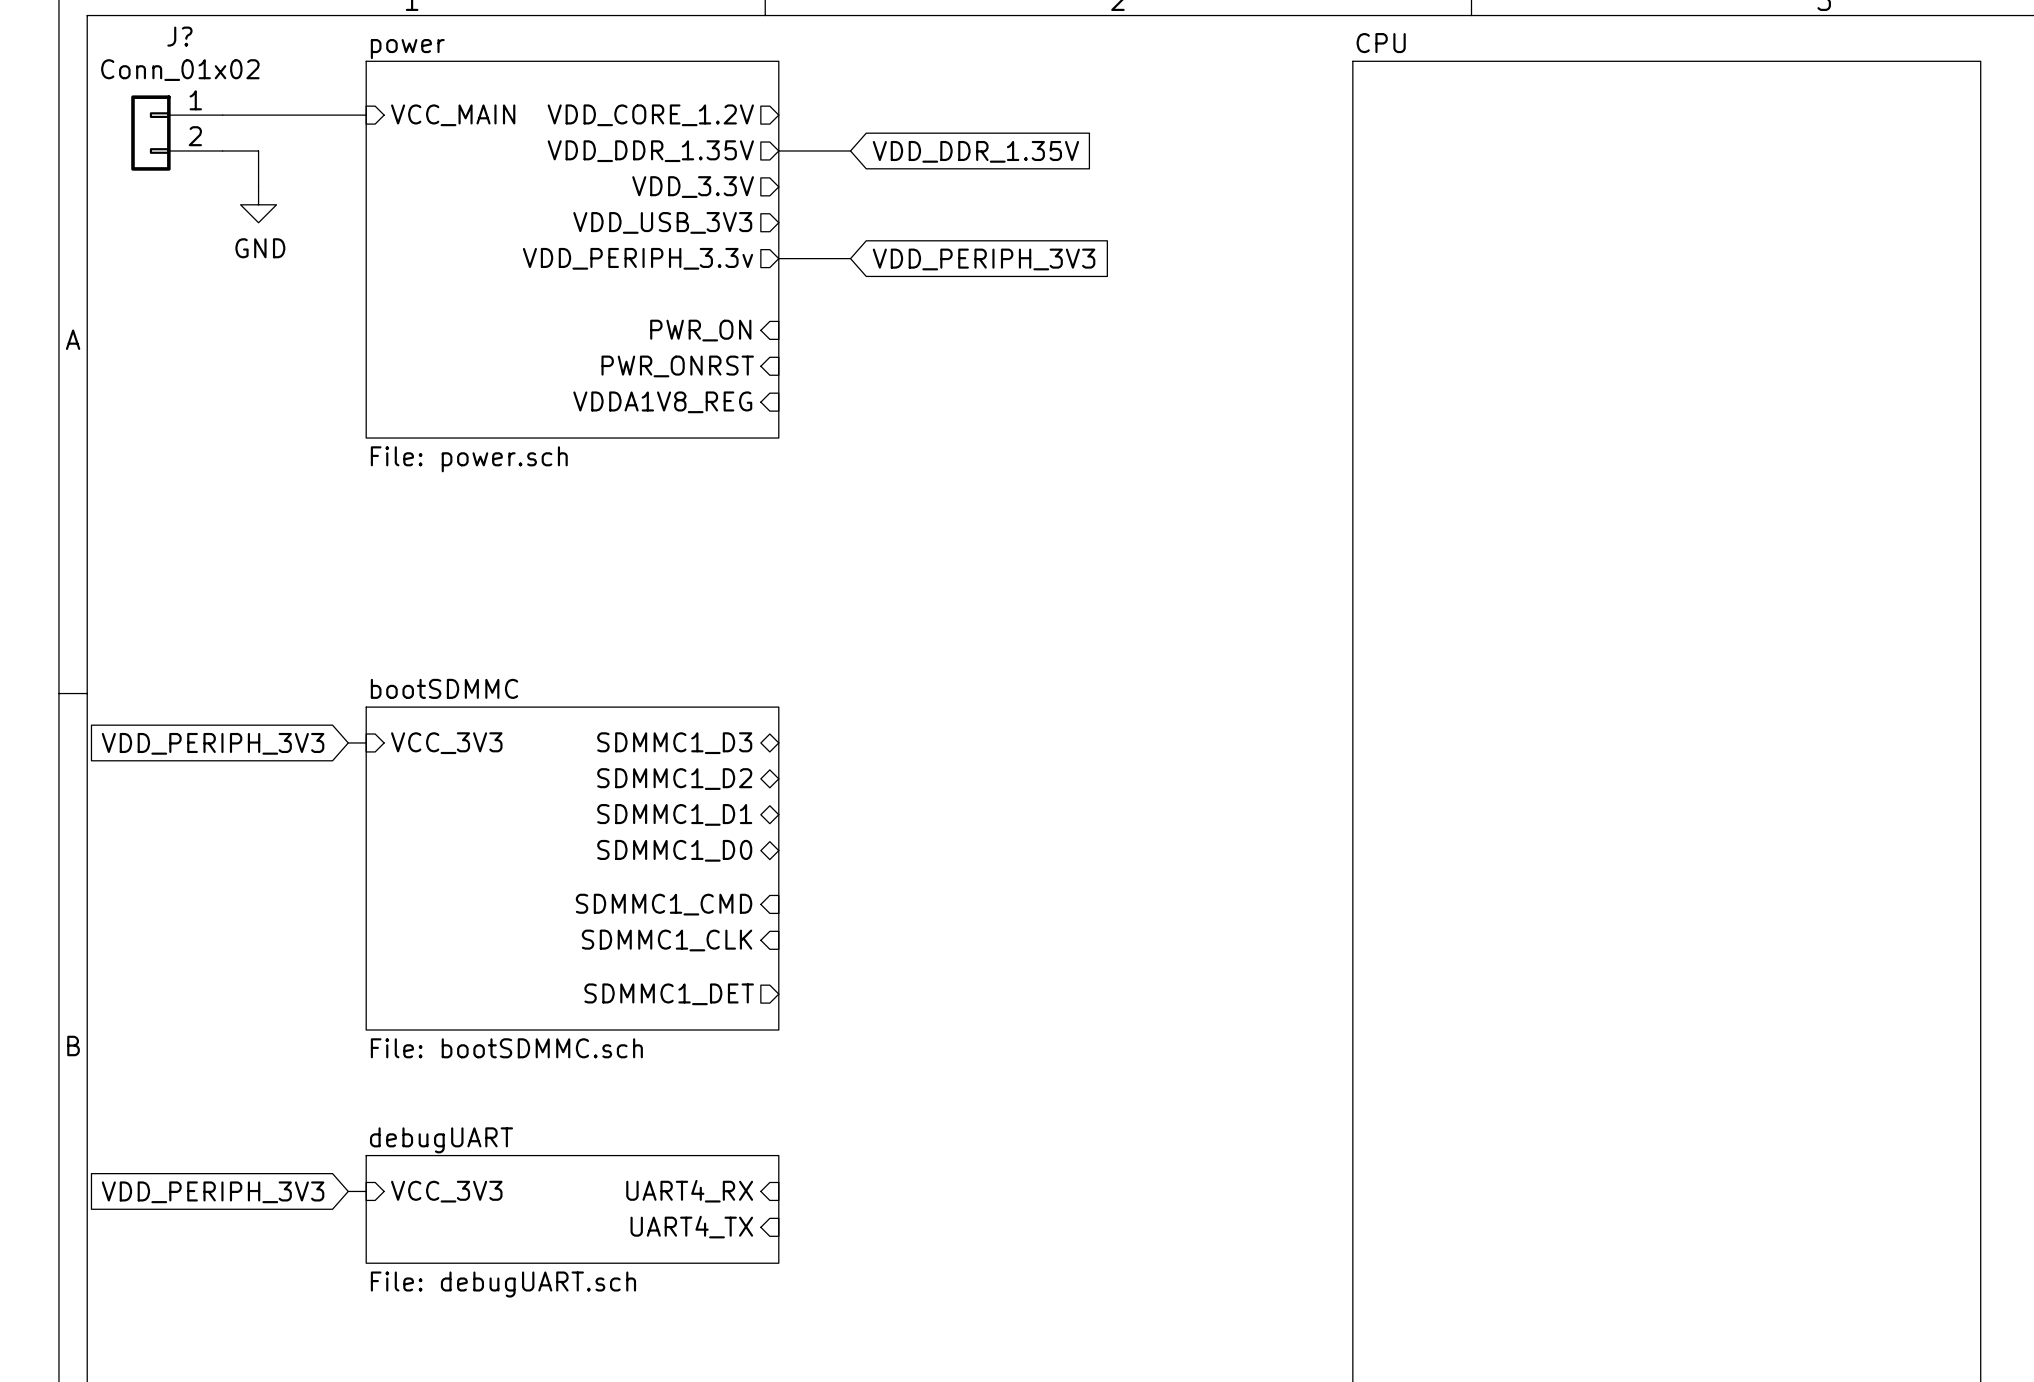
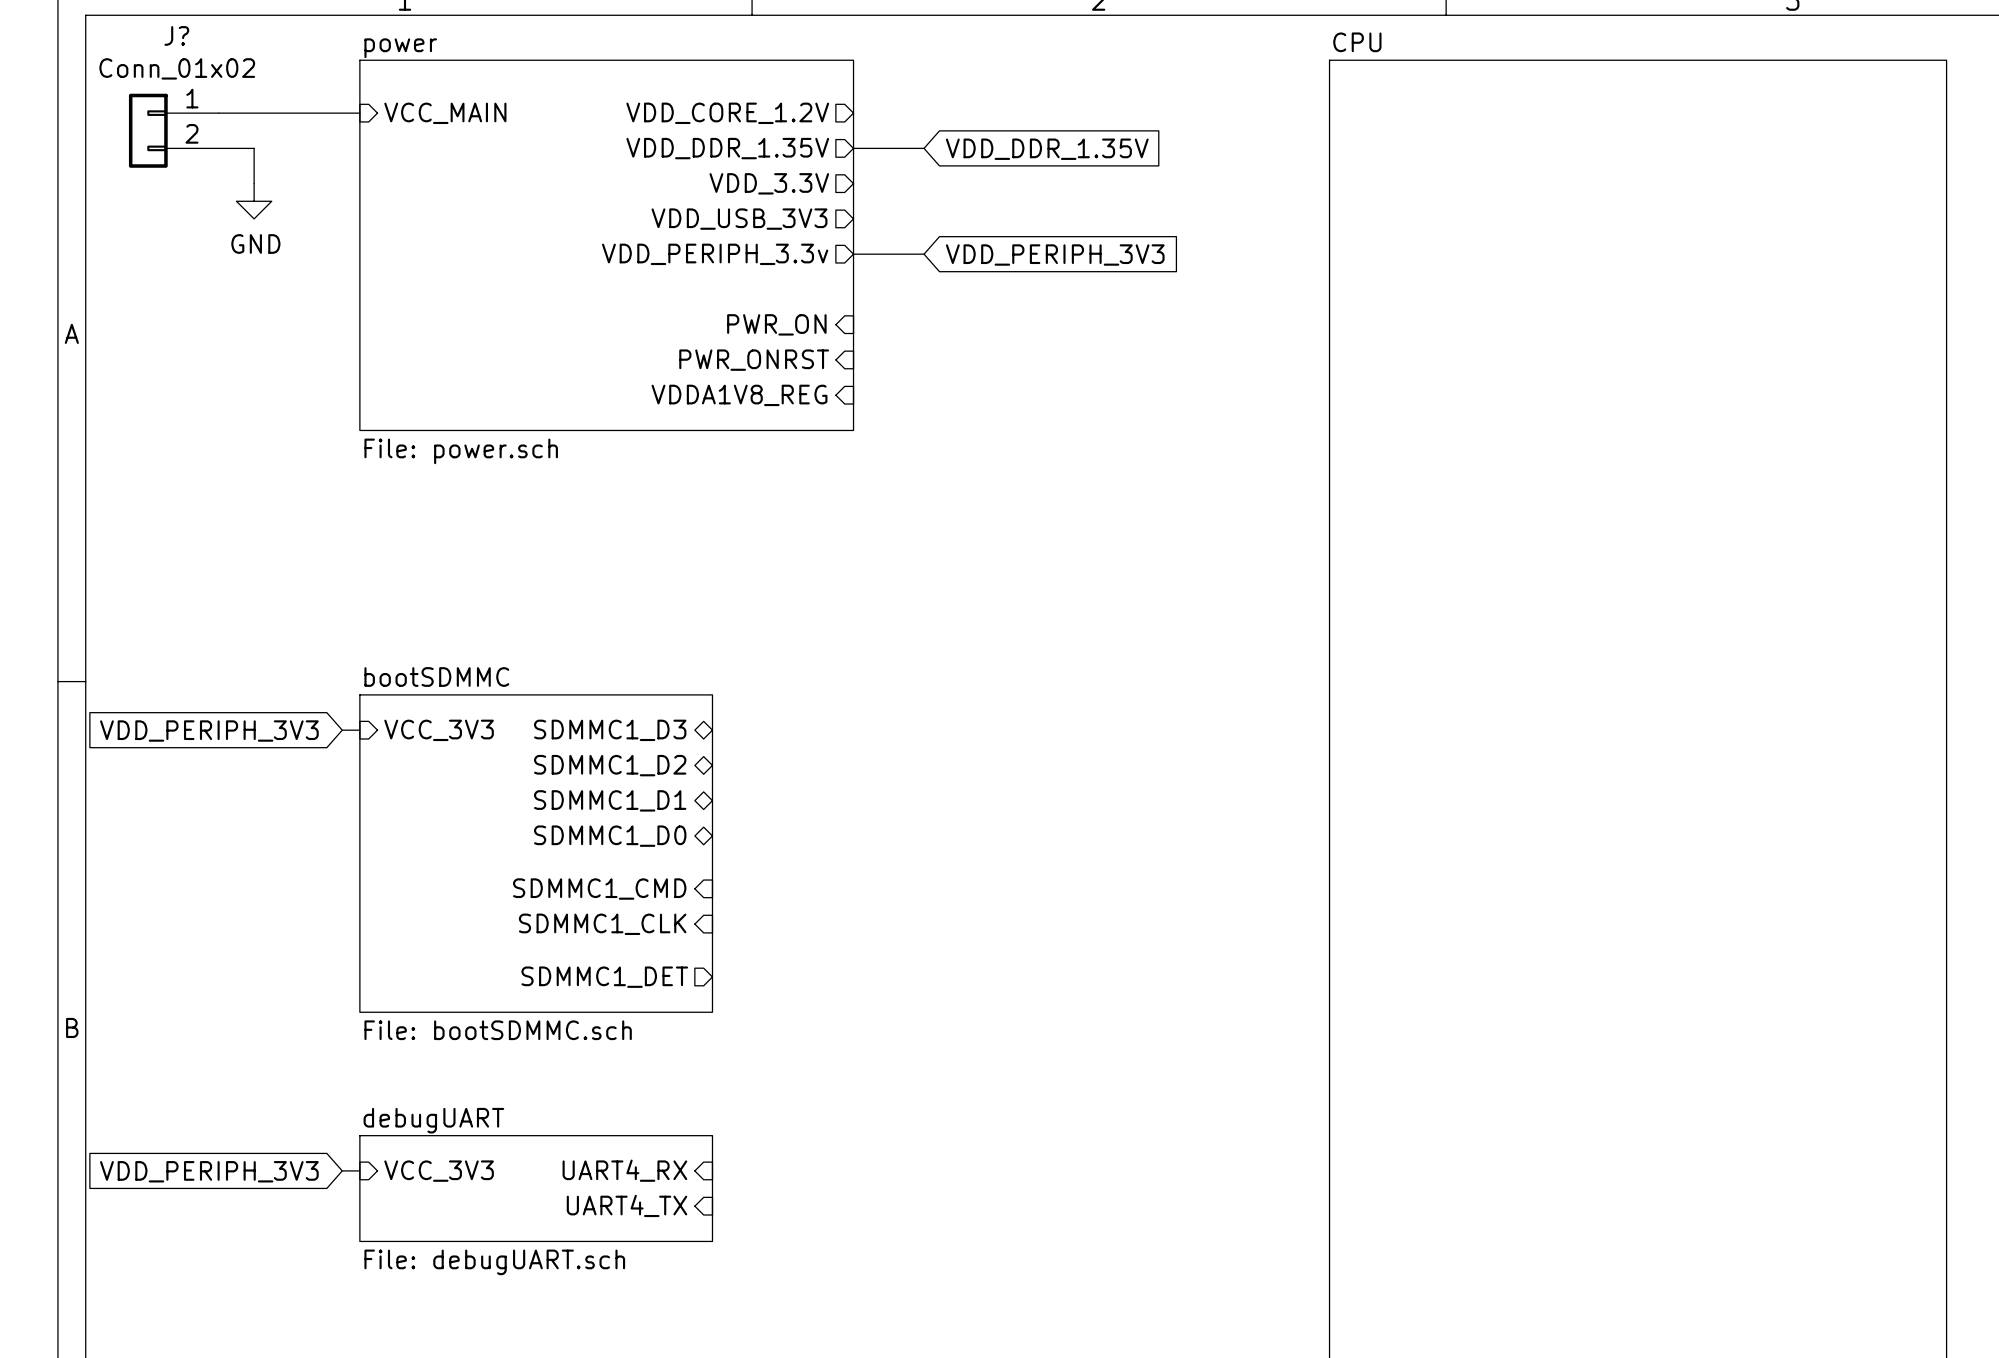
sheet pin position: VDD_CORE_1.2V (650, 115) -> VDD_CORE_1.2V (727, 113)
wire: (778, 150) (850, 150) -> (853, 148) (924, 148)
sheet pin position: VDD_DDR_1.35V (650, 151) -> VDD_DDR_1.35V (727, 148)
global label position: VDD_DDR_1.35V (975, 151) -> VDD_DDR_1.35V (1047, 149)
sheet pin position: VDD_3.3V (693, 187) -> VDD_3.3V (769, 183)
sheet pin position: VDD_USB_3V3 (662, 222) -> VDD_USB_3V3 (739, 219)
sheet power: File: power.sch (572, 249) -> none
sheet power: none -> File: power.sch (606, 245)
sheet pin position: VDD_PERIPH_3.3v (637, 258) -> VDD_PERIPH_3.3v (715, 254)
wire: (778, 258) (850, 258) -> (853, 254) (924, 254)
global label position: VDD_PERIPH_3V3 (984, 259) -> VDD_PERIPH_3V3 (1055, 255)
sheet pin position: PWR_ON (700, 330) -> PWR_ON (776, 324)
sheet pin position: PWR_ONRST (677, 366) -> PWR_ONRST (754, 360)
sheet pin position: VDDA1V8_REG (662, 402) -> VDDA1V8_REG (739, 395)
sheet pin position: SDMMC1_D3 (674, 743) -> SDMMC1_D3 (610, 730)
sheet pin position: SDMMC1_D2 (674, 779) -> SDMMC1_D2 (610, 765)
sheet pin position: SDMMC1_D1 (674, 814) -> SDMMC1_D1 (610, 800)
sheet pin position: SDMMC1_D0 (674, 850) -> SDMMC1_D0 (610, 836)
sheet bootSDMMC: none -> File: bootSDMMC.sch (536, 853)
sheet bootSDMMC: File: bootSDMMC.sch (572, 868) -> none
sheet pin position: SDMMC1_CMD (664, 904) -> SDMMC1_CMD (599, 889)
sheet pin position: SDMMC1_CLK (667, 940) -> SDMMC1_CLK (602, 924)
sheet pin position: SDMMC1_DET (669, 994) -> SDMMC1_DET (604, 977)
sheet pin position: UART4_RX (689, 1191) -> UART4_RX (624, 1170)
sheet debugUART: none -> File: debugUART.sch (536, 1188)
sheet debugUART: File: debugUART.sch (572, 1209) -> none
sheet pin position: UART4_TX (691, 1227) -> UART4_TX (627, 1205)

